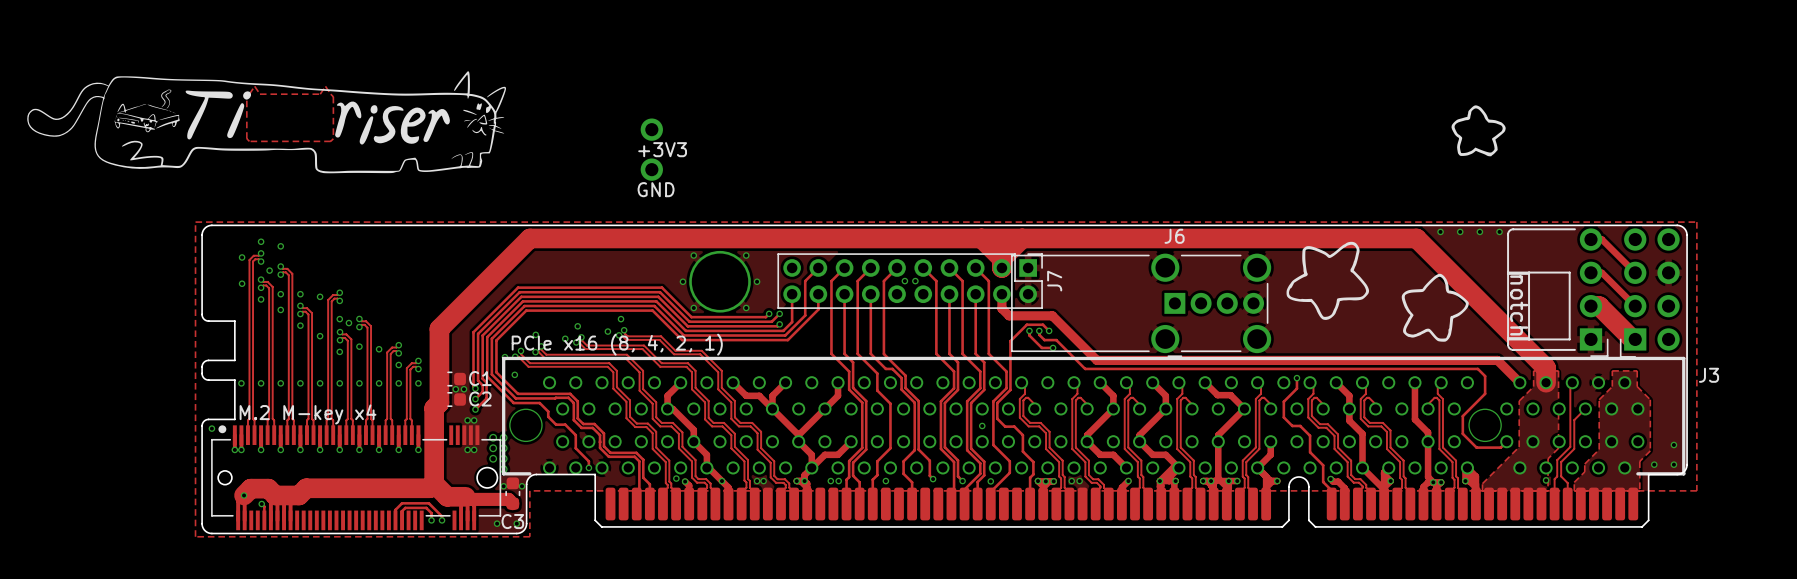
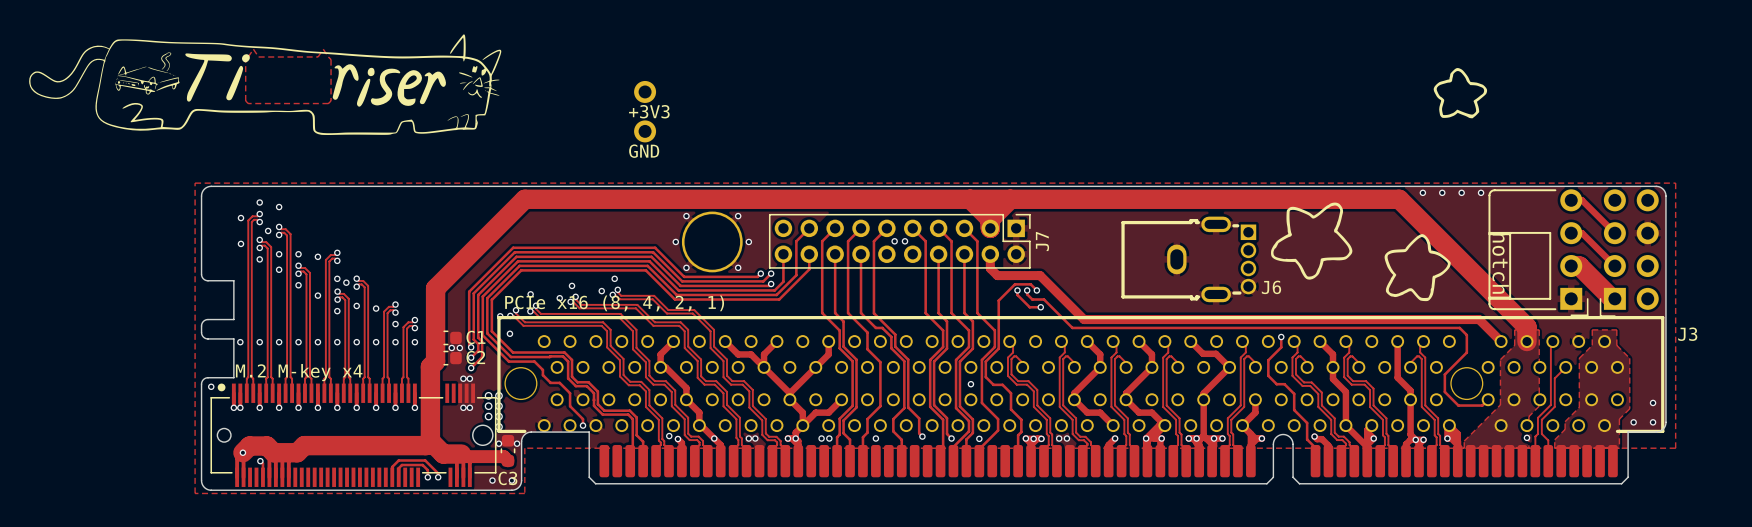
J6 name position: J6 (1174, 236) -> J6 (1271, 287)
J6 footprint: [1011, 253, 1272, 358] -> [1121, 216, 1257, 303]

